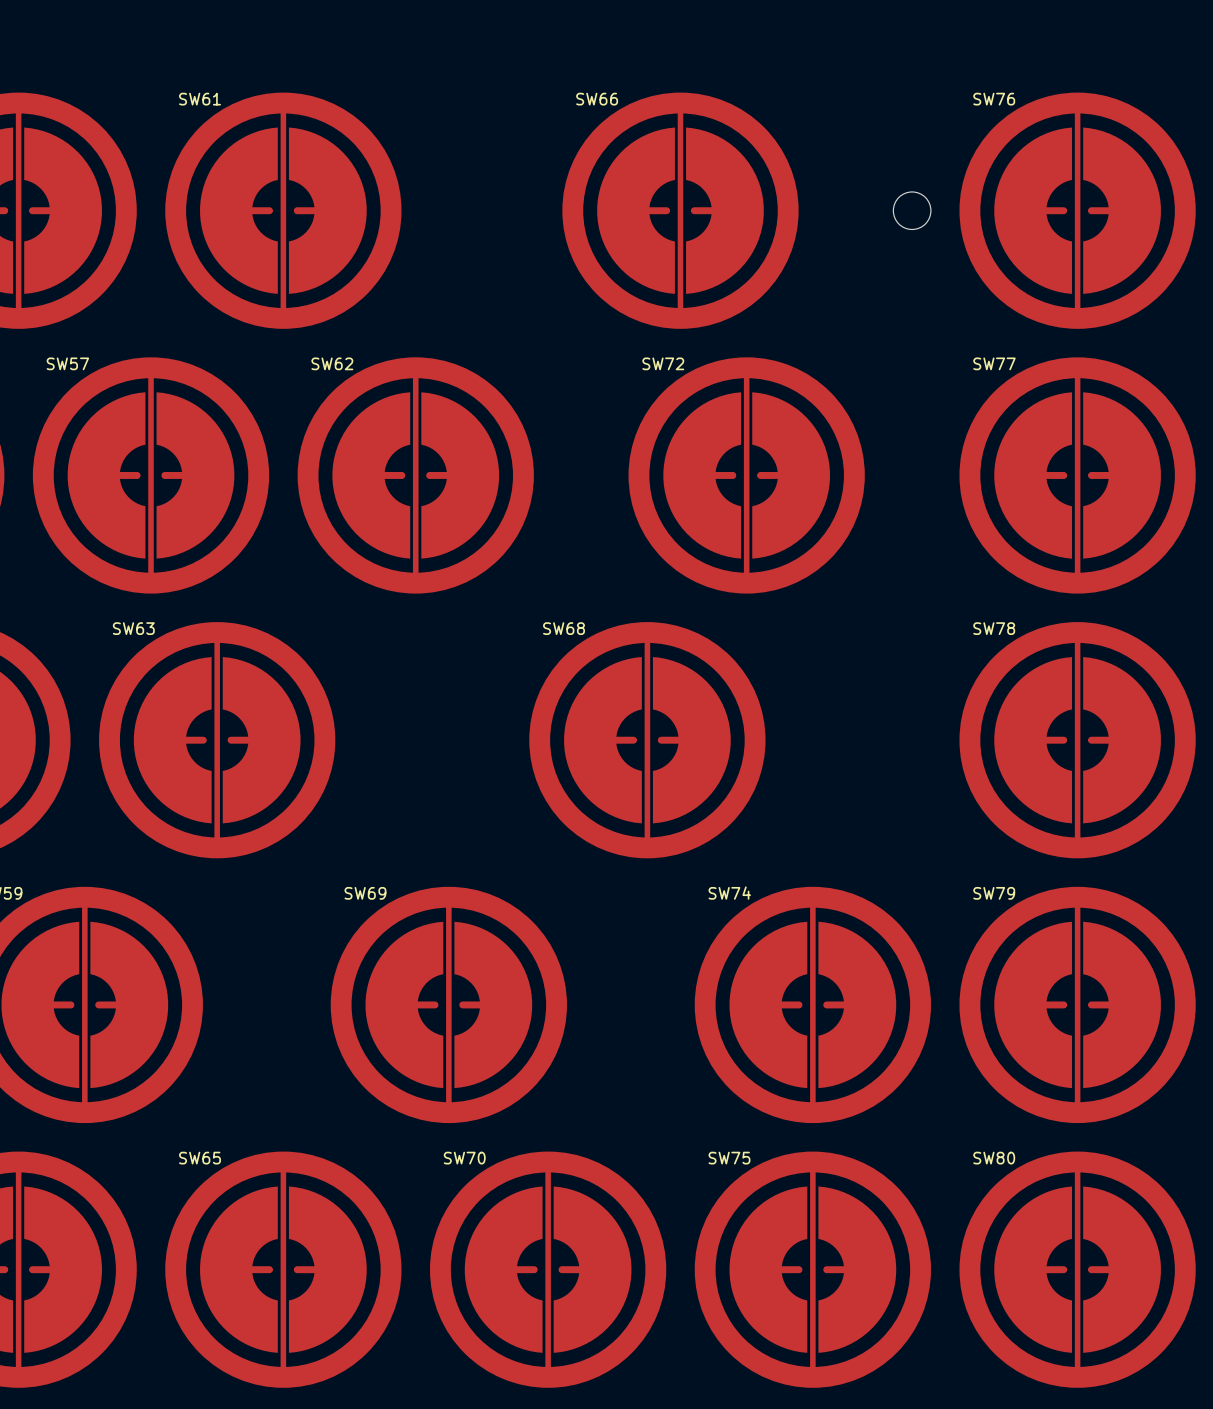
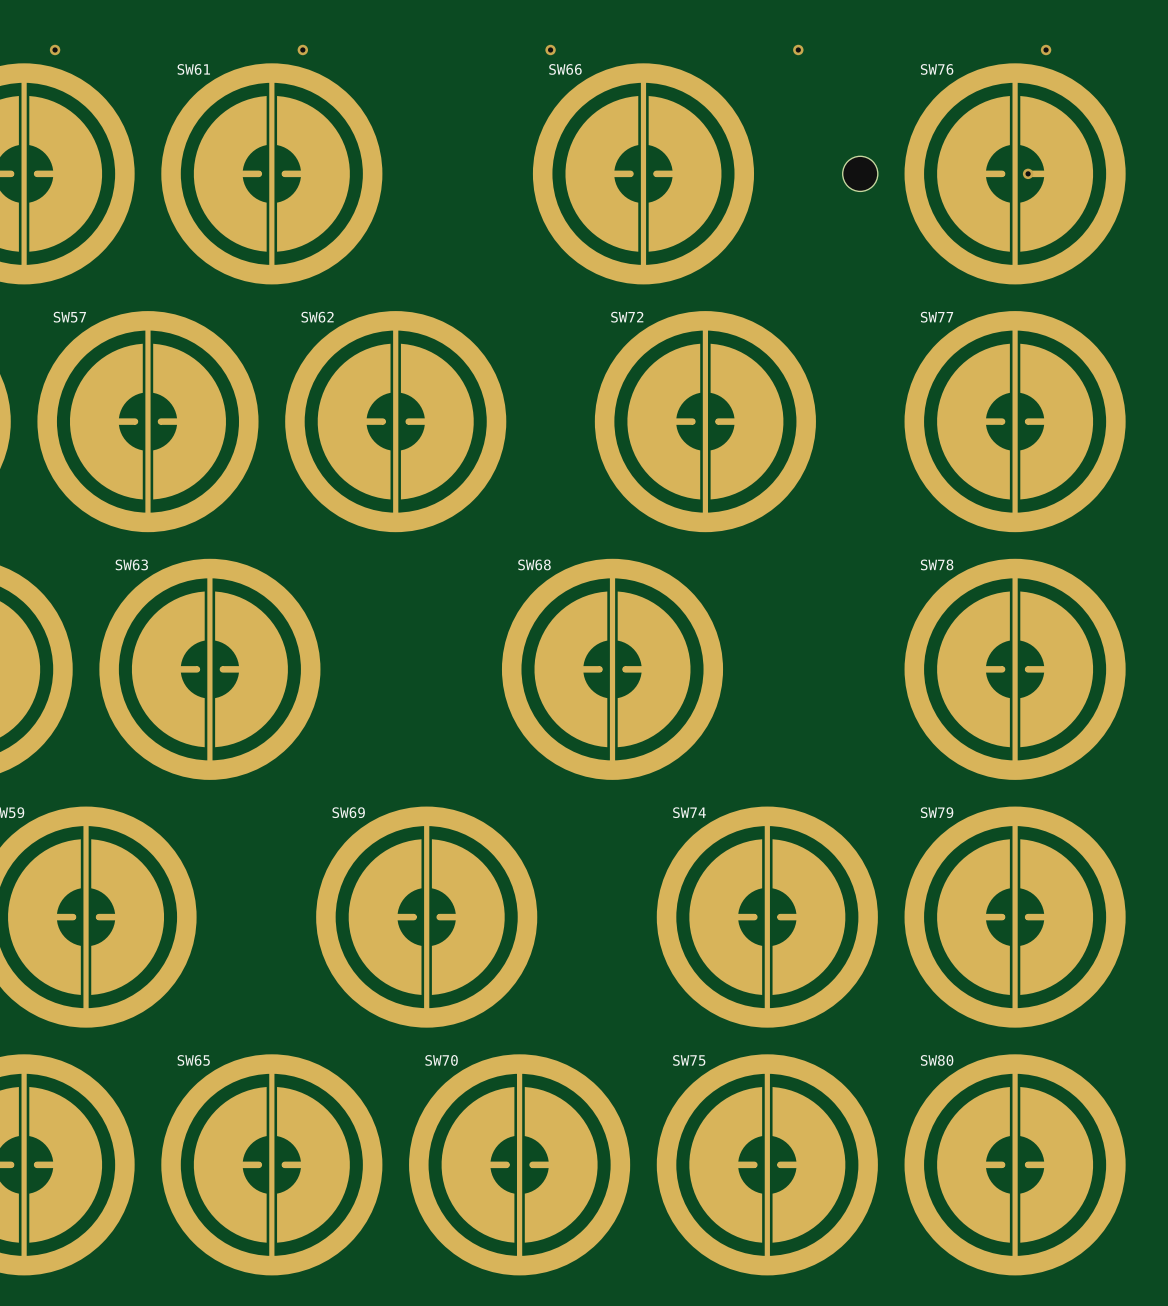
via: none -> (55, 49)
via: none -> (302, 49)
via: none -> (550, 49)
via: none -> (798, 49)
via: none -> (1046, 49)
via: none -> (1028, 173)

